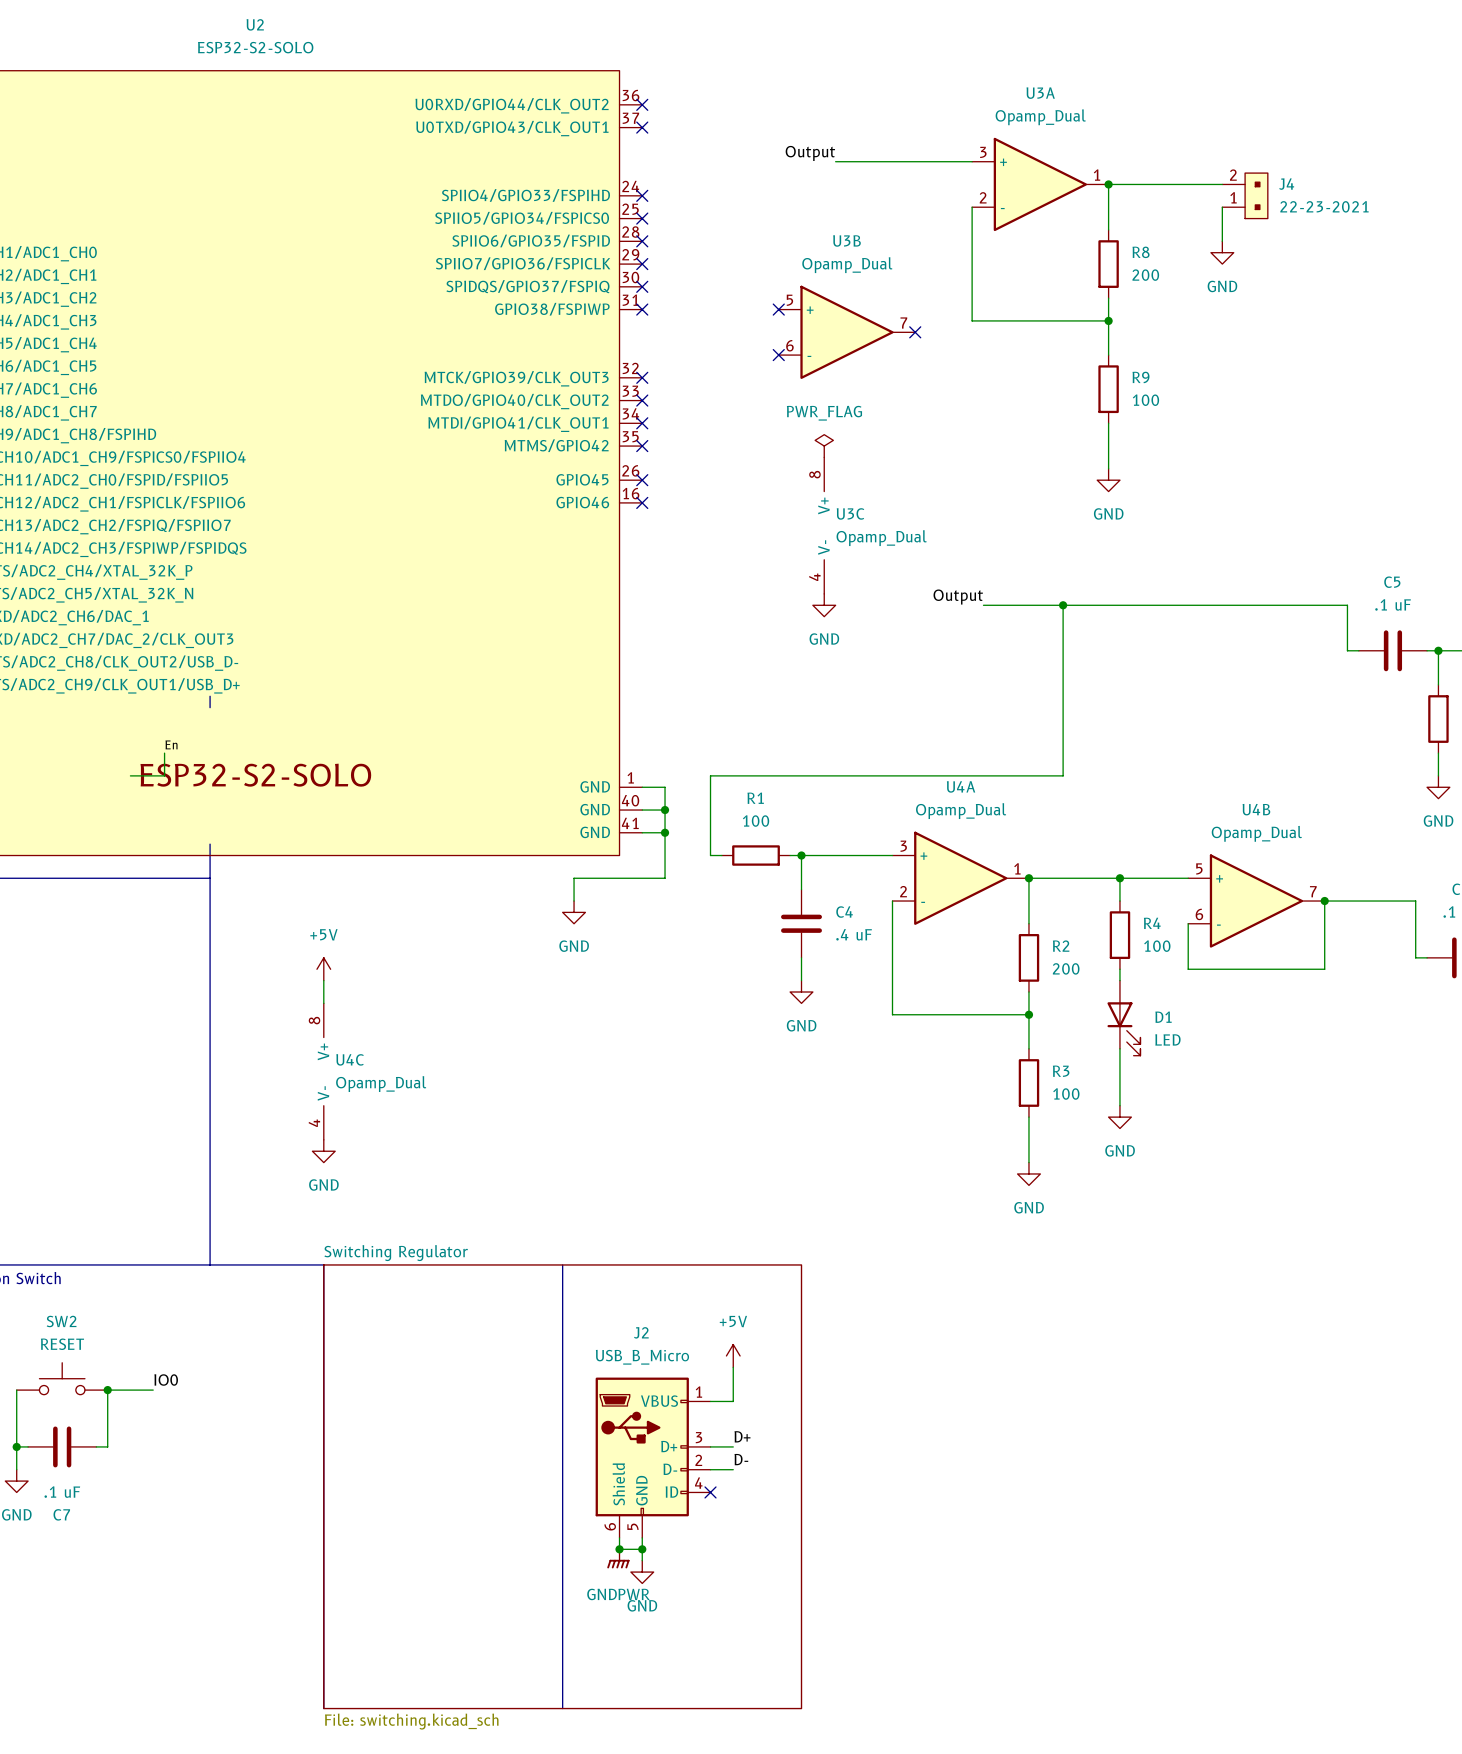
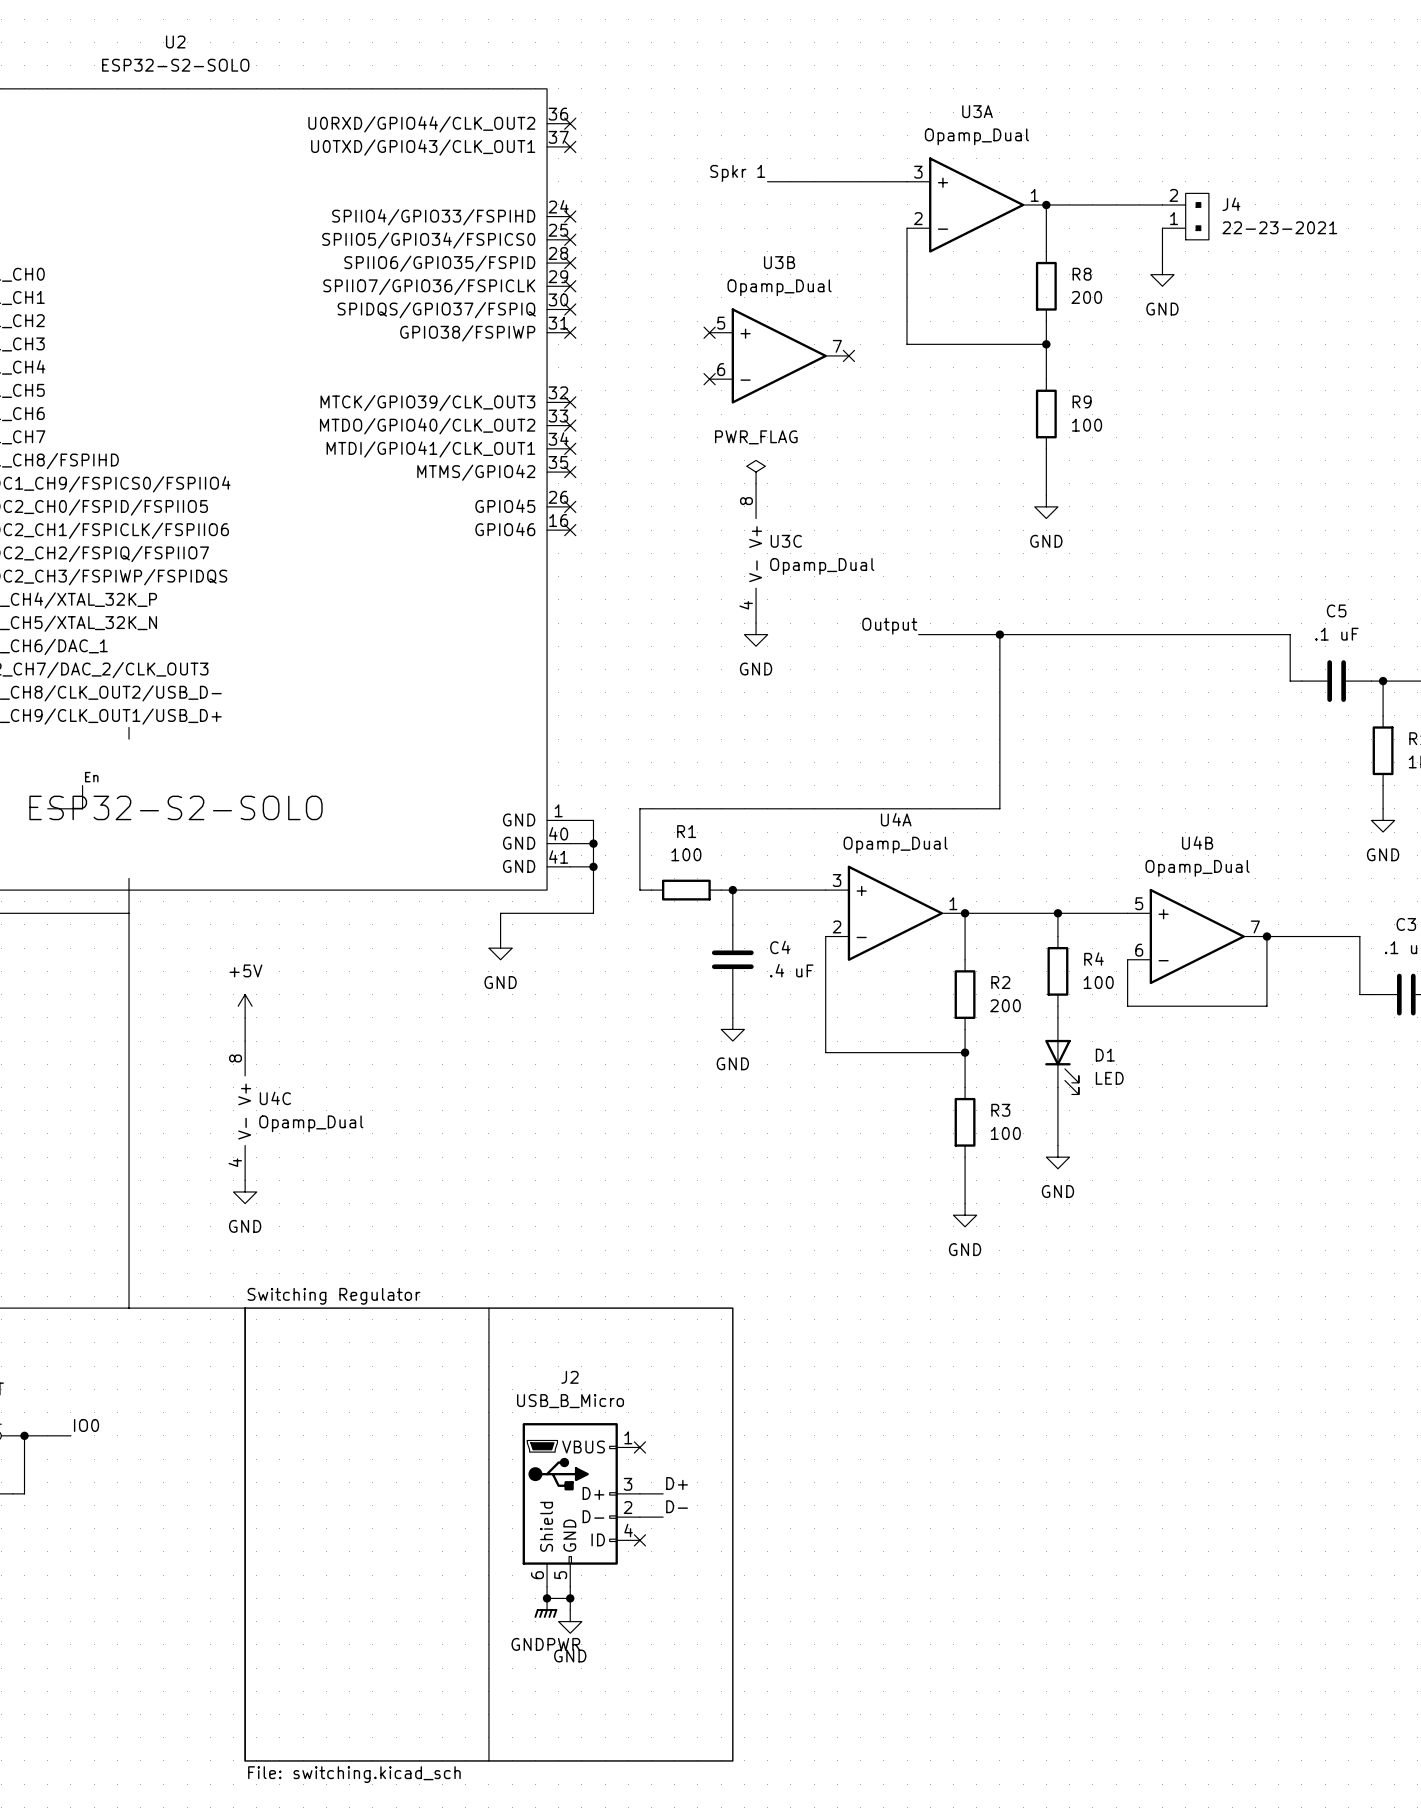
label: Output (810, 153) -> Spkr 1 (737, 173)
power symbol: +5V (733, 1355) -> none
wire: (733, 1367) (733, 1401) (710, 1401) -> none
no-connect mark: none -> (639, 1447)

